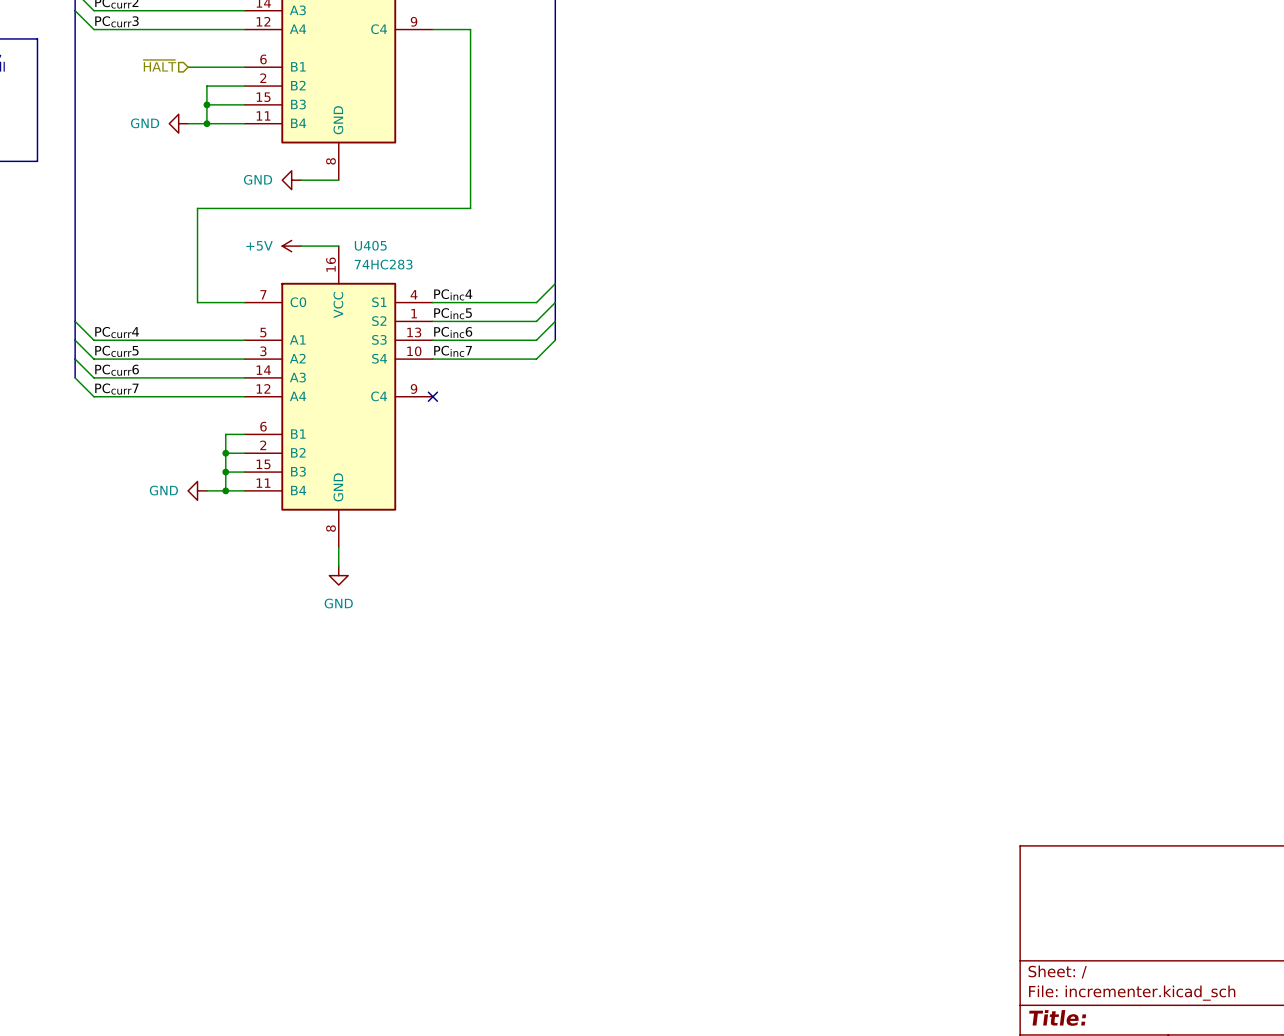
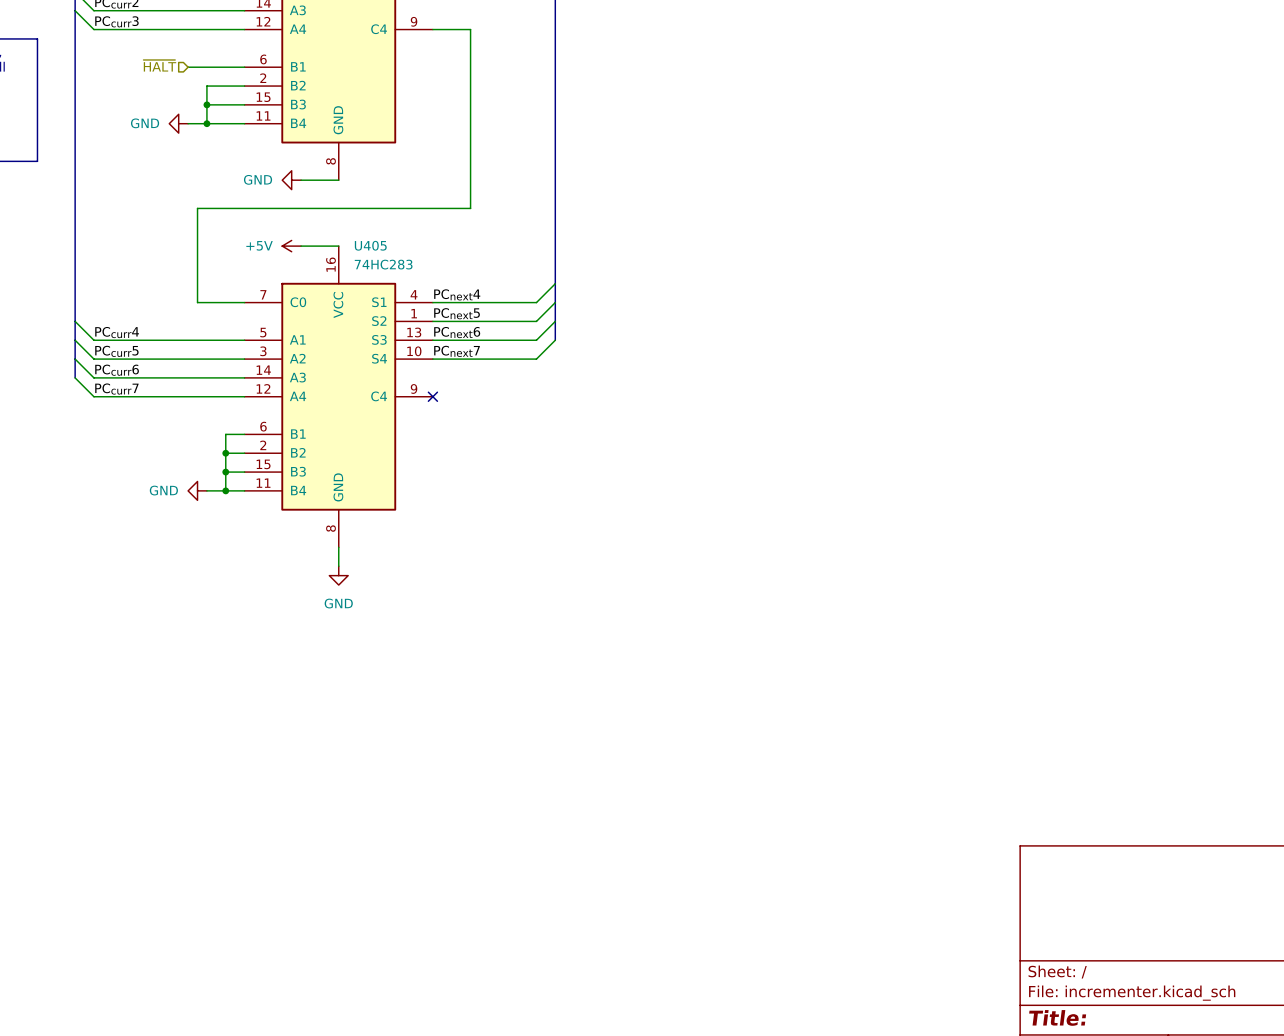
label: PCinc4 (453, 294) -> PCnext4 (457, 294)
label: PCinc5 (453, 313) -> PCnext5 (457, 313)
label: PCinc6 (453, 332) -> PCnext6 (457, 332)
label: PCinc7 (453, 351) -> PCnext7 (457, 351)

